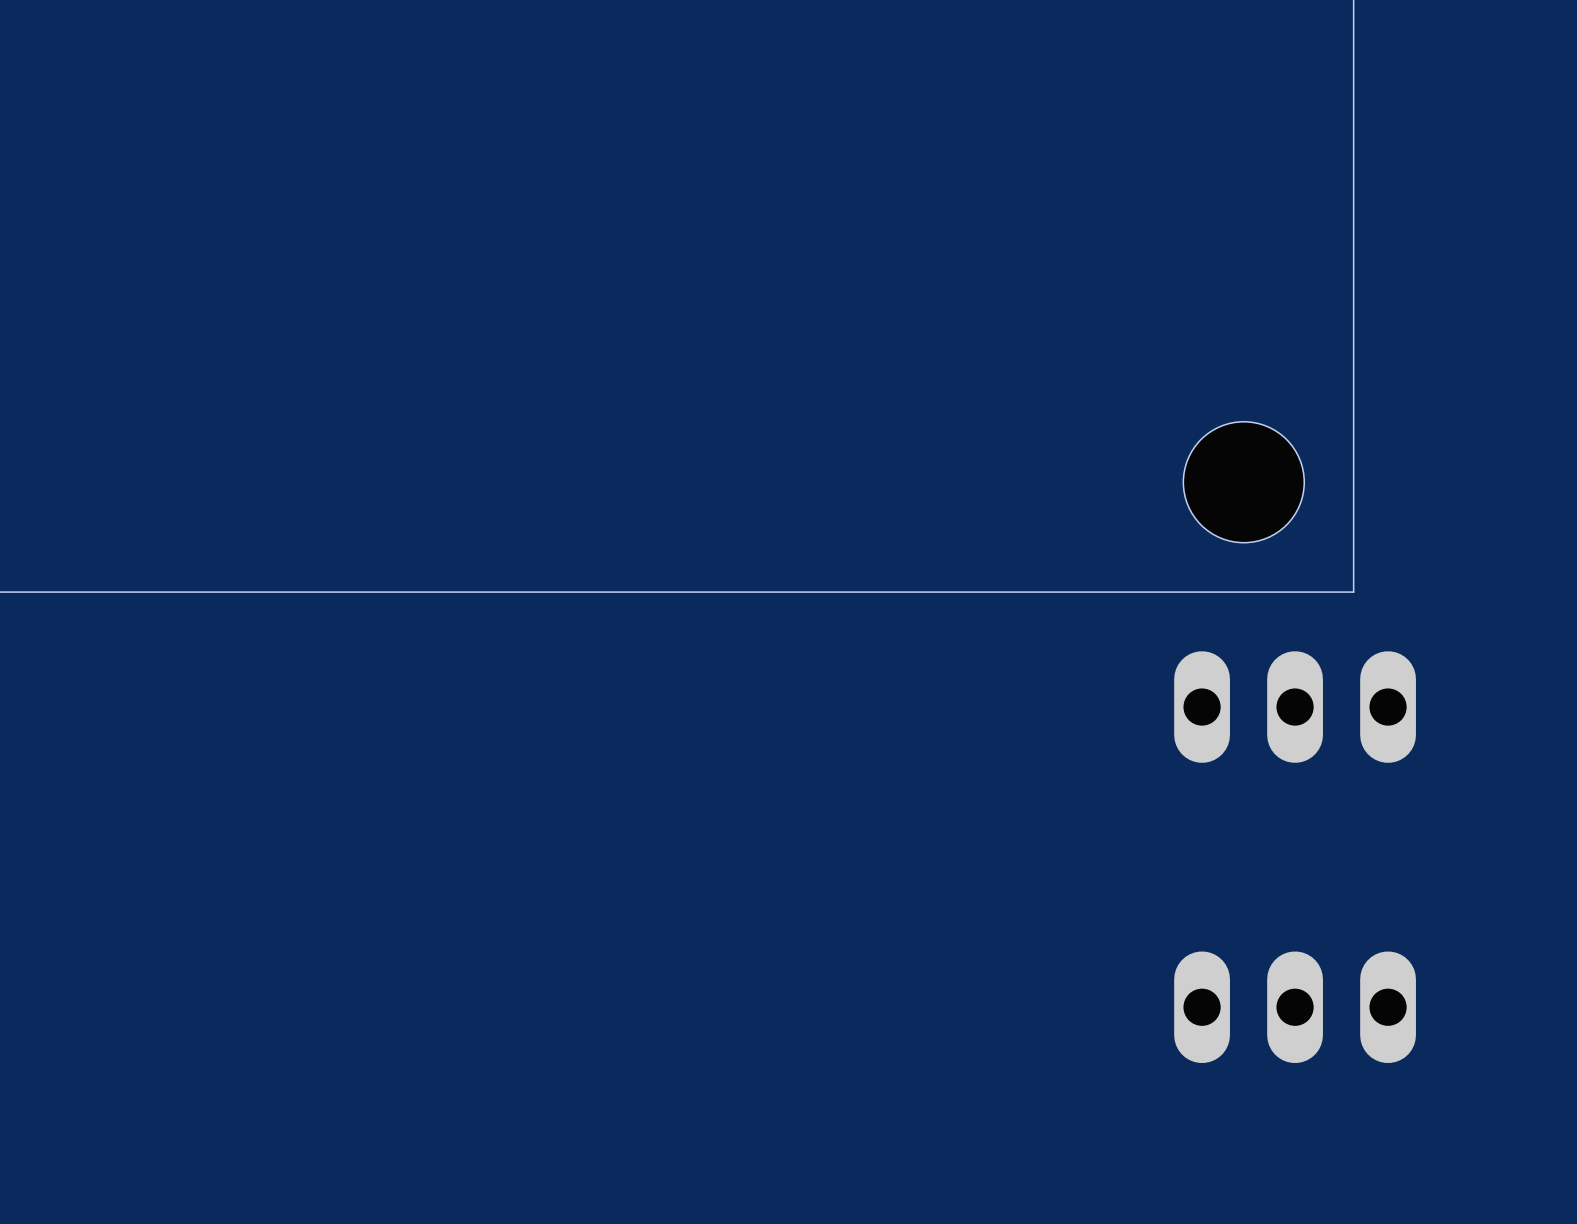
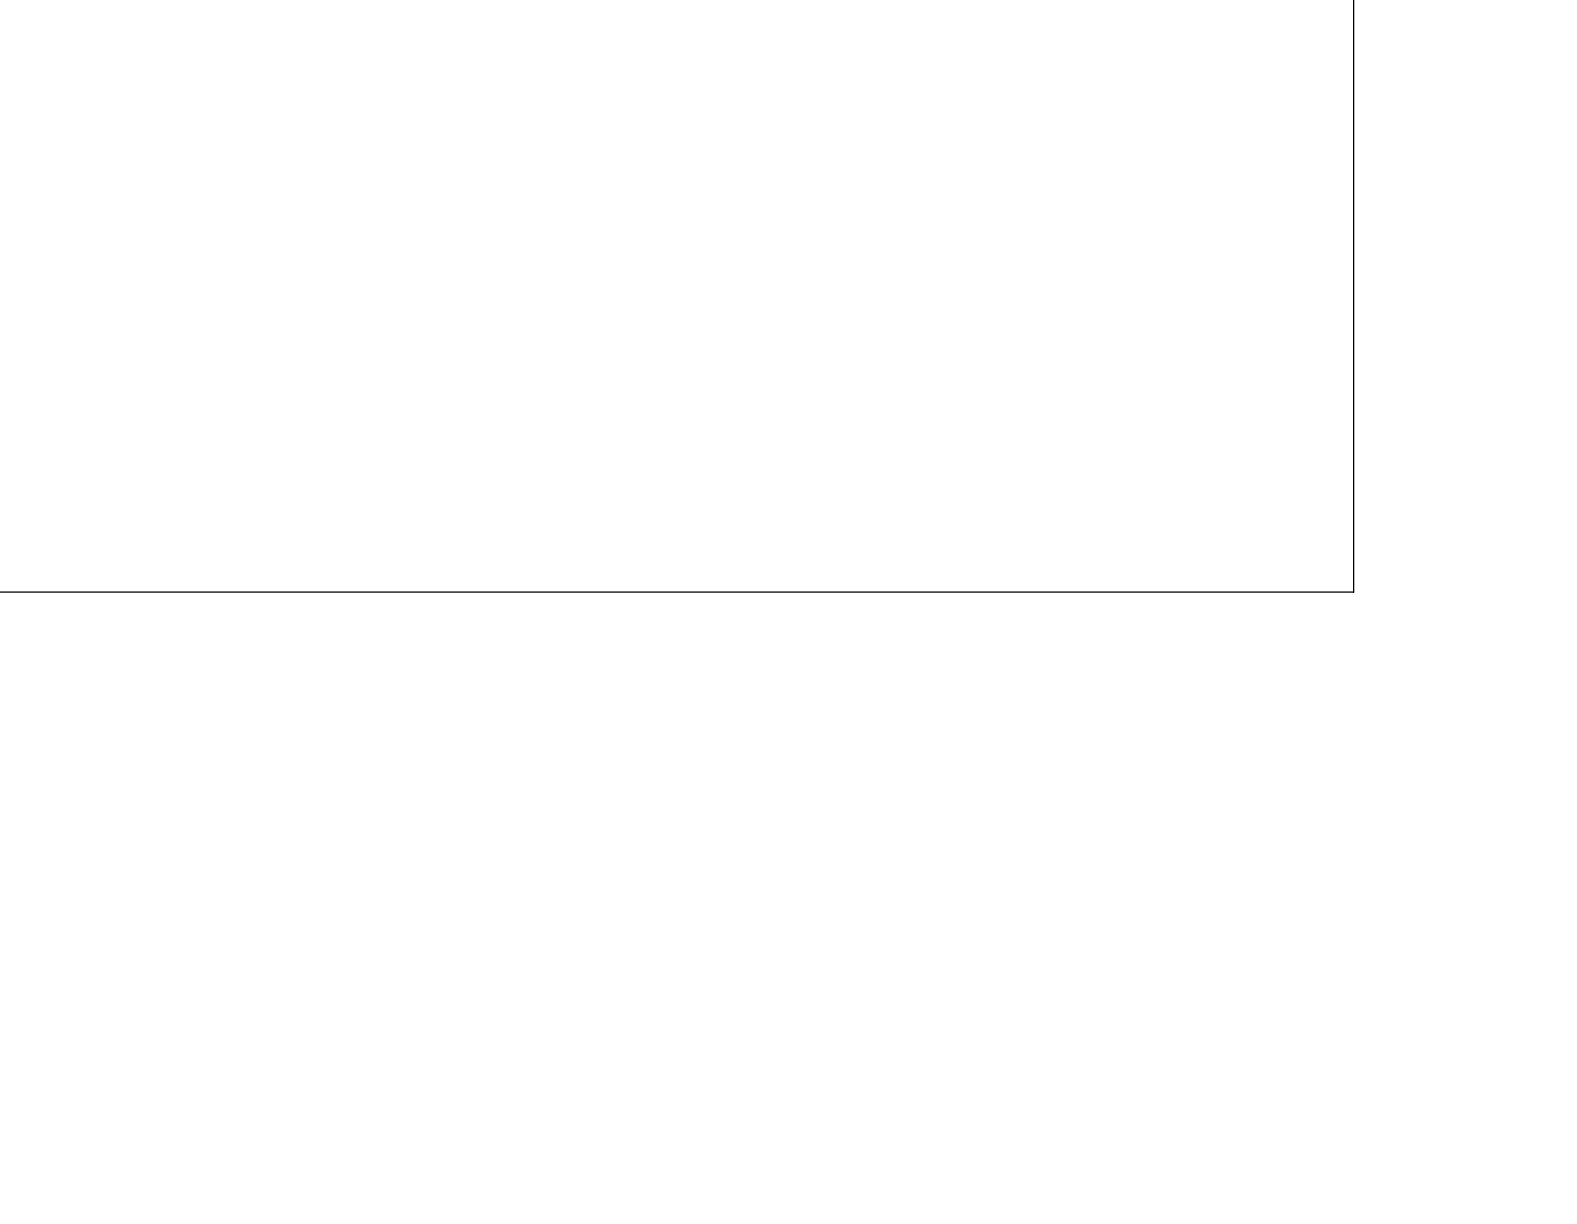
part: (1243, 482) -> none
part: (1295, 707) -> none
part: (1295, 1007) -> none

